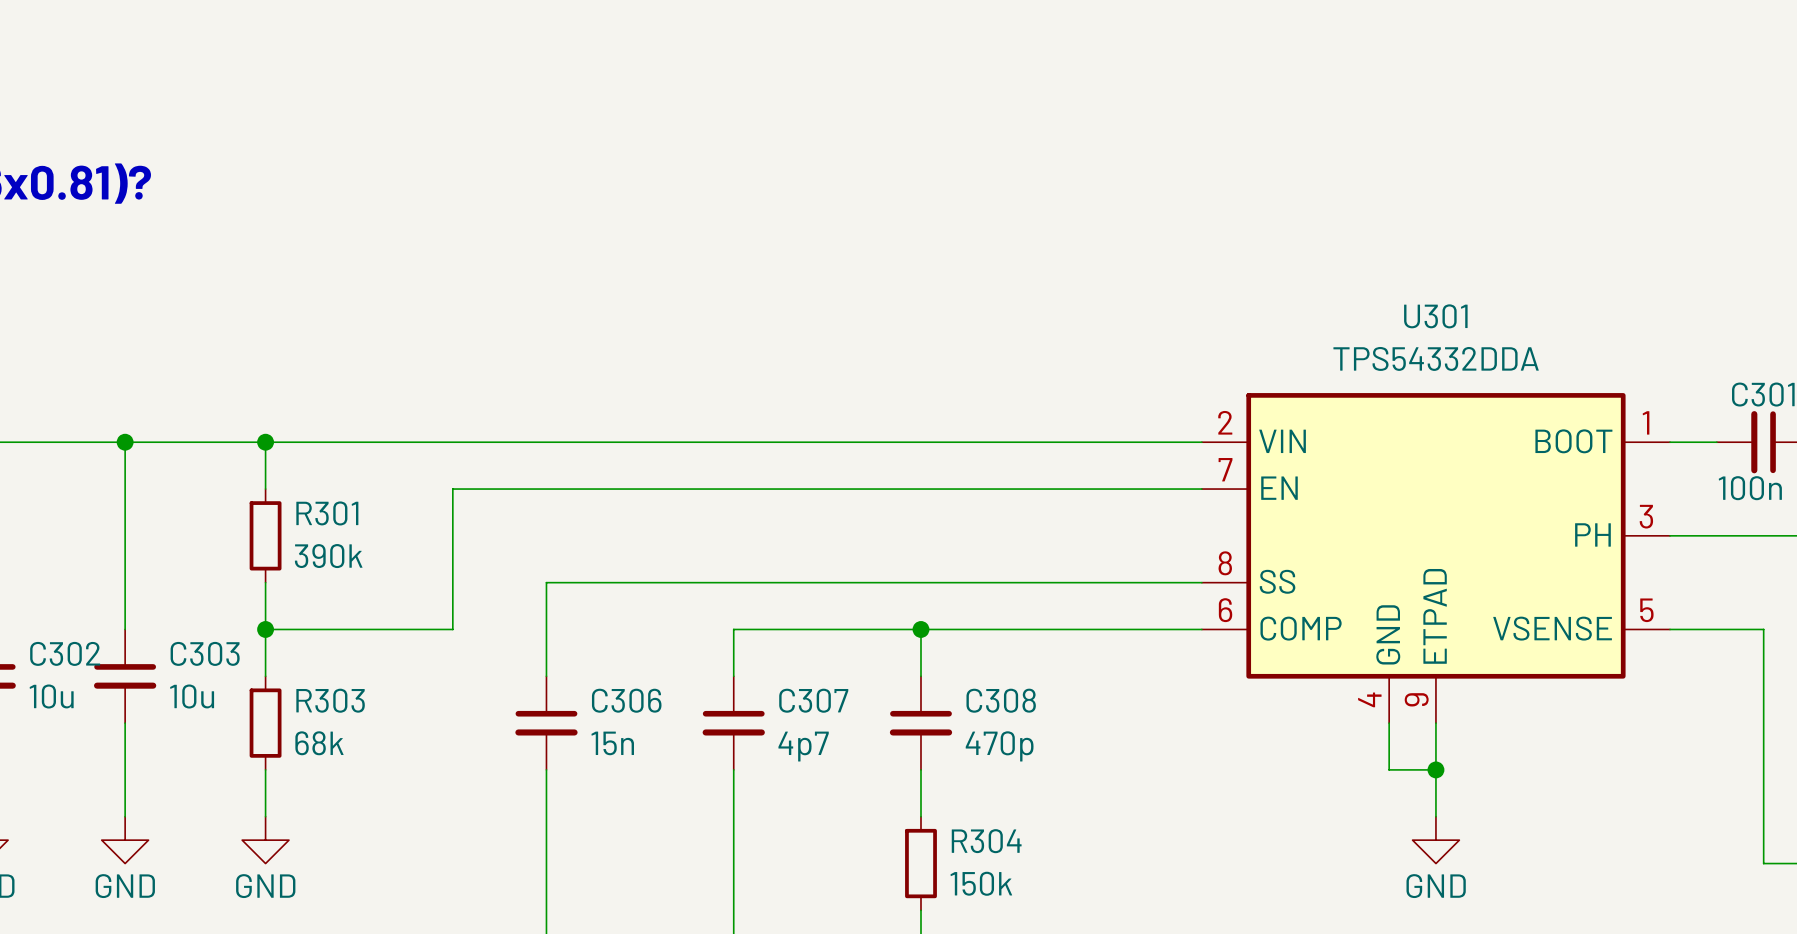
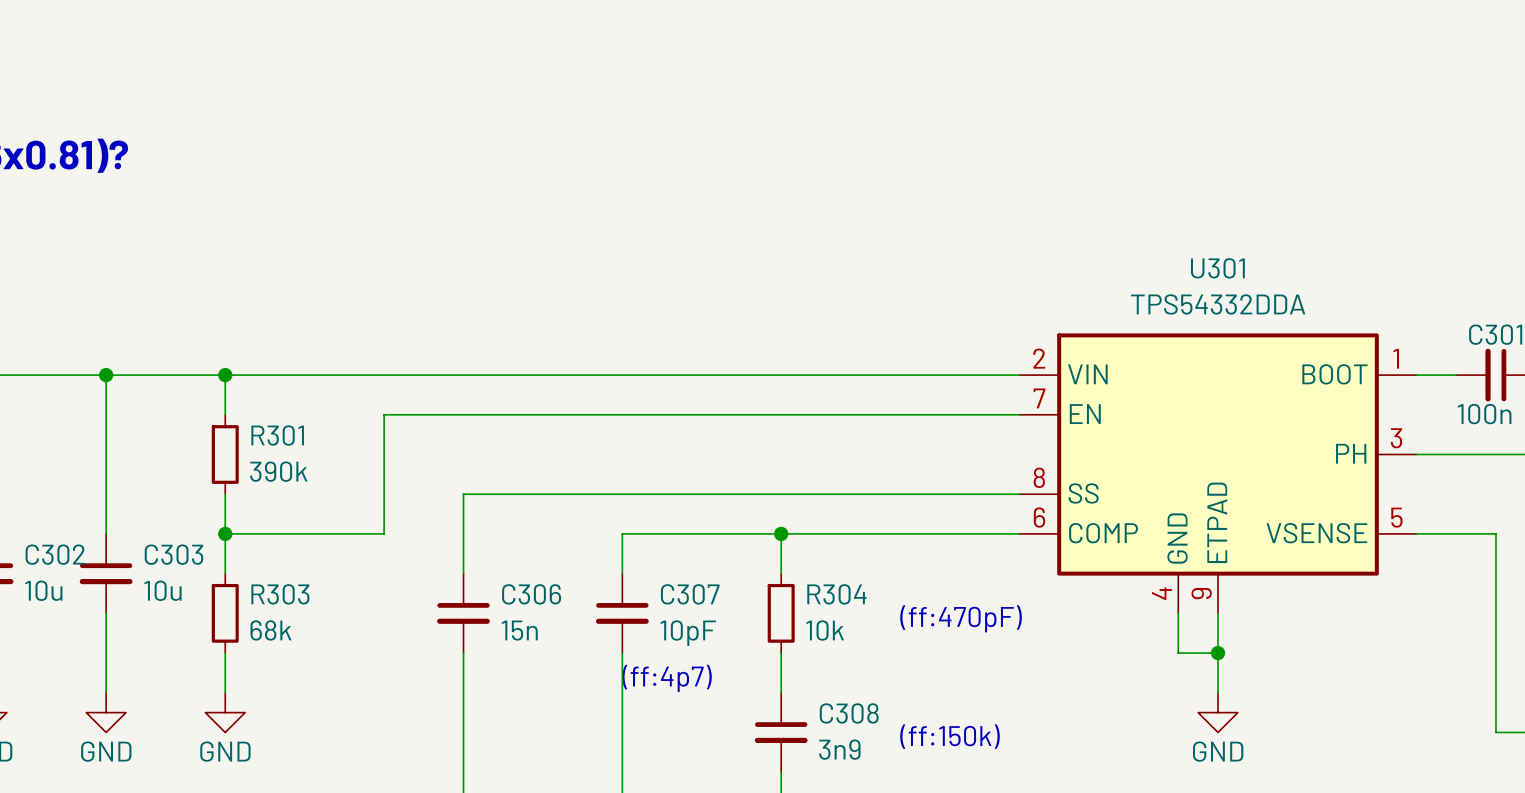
C308 position: (920, 723) -> (781, 732)
text: none -> (ff:470pF) (961, 618)
C307 value: 4p7 (803, 746) -> 10pF (688, 633)
C308 value: 470p (999, 746) -> 3n9 (839, 749)
text: none -> (ff:4p7) (667, 678)
R304 position: (920, 863) -> (781, 613)
text: none -> (ff:150k) (949, 736)
R304 value: 150k (981, 883) -> 10k (825, 630)

